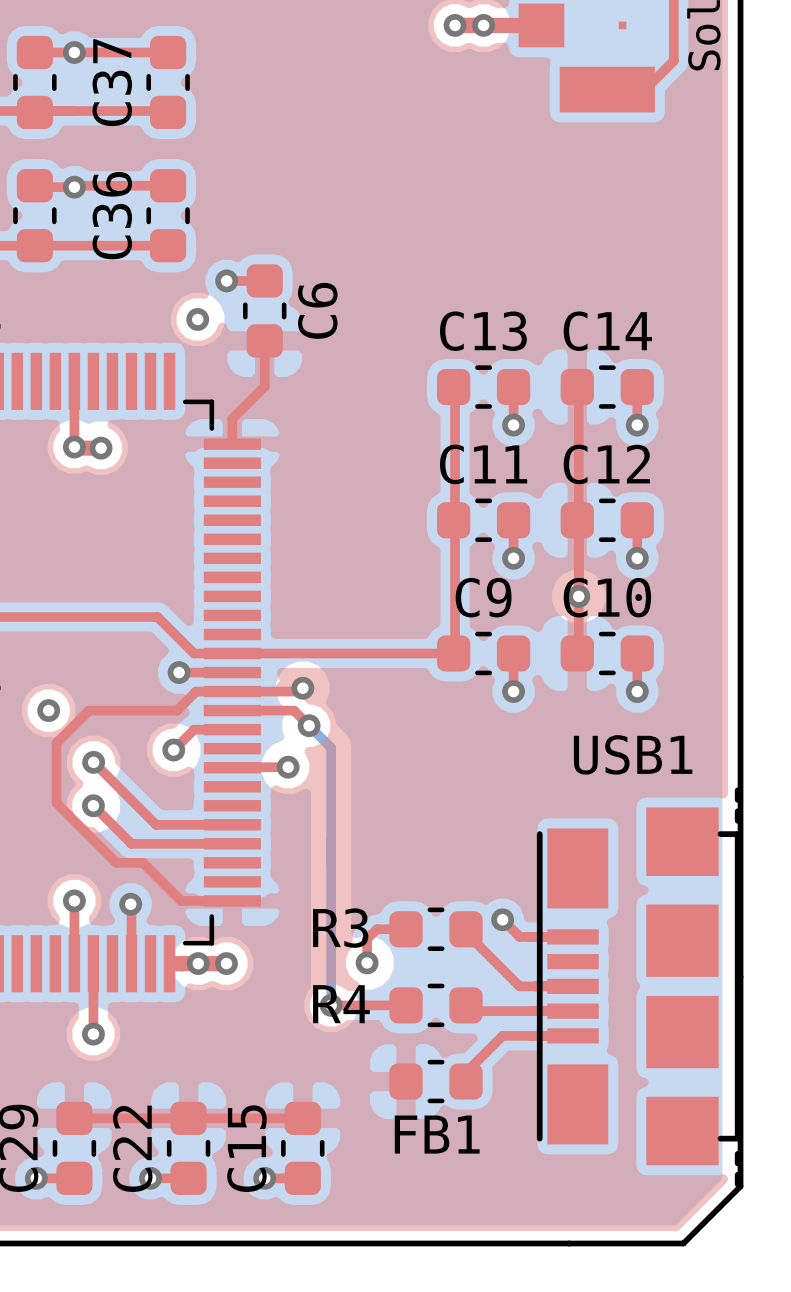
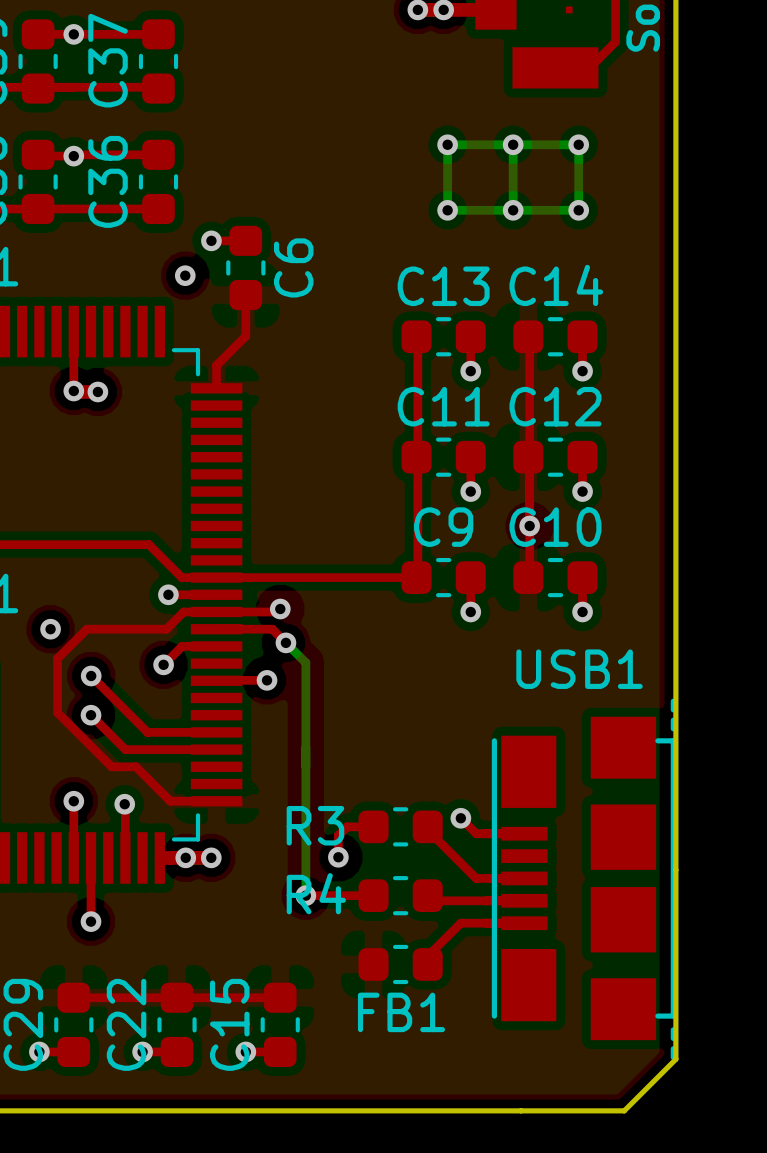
bottom track: none -> (447, 144) (578, 144) (578, 210) (447, 210) (447, 144)
via: none -> (447, 144)
bottom track: none -> (513, 144) (513, 210)
via: none -> (513, 144)
via: none -> (578, 144)
via: none -> (447, 210)
via: none -> (513, 210)
via: none -> (578, 210)

